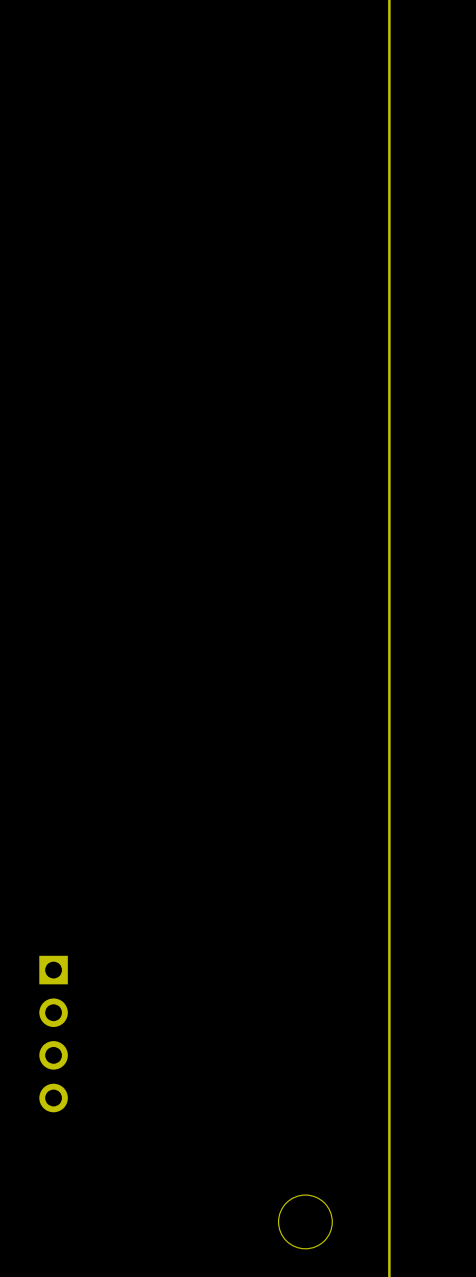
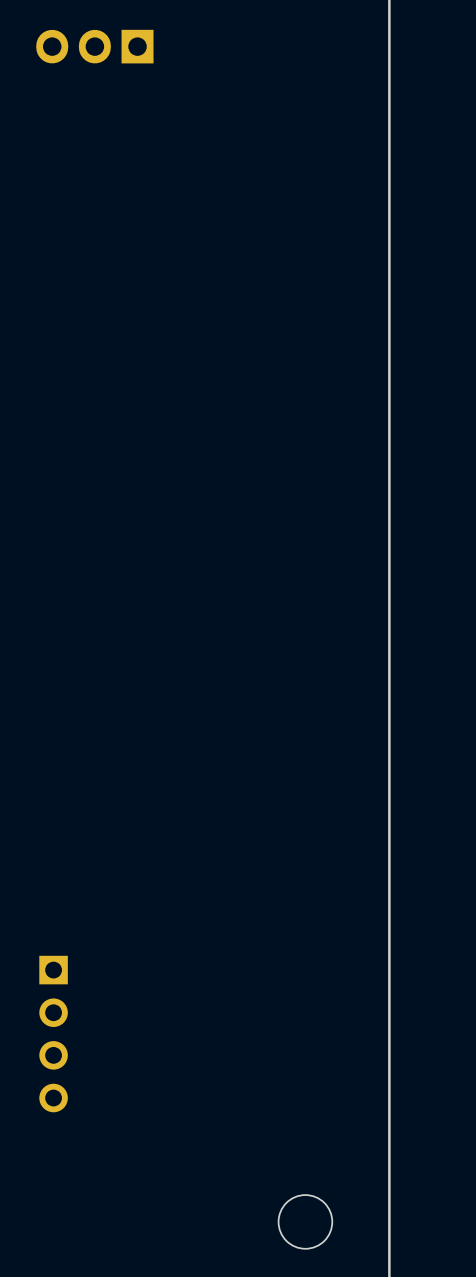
part: none -> (94, 46)

